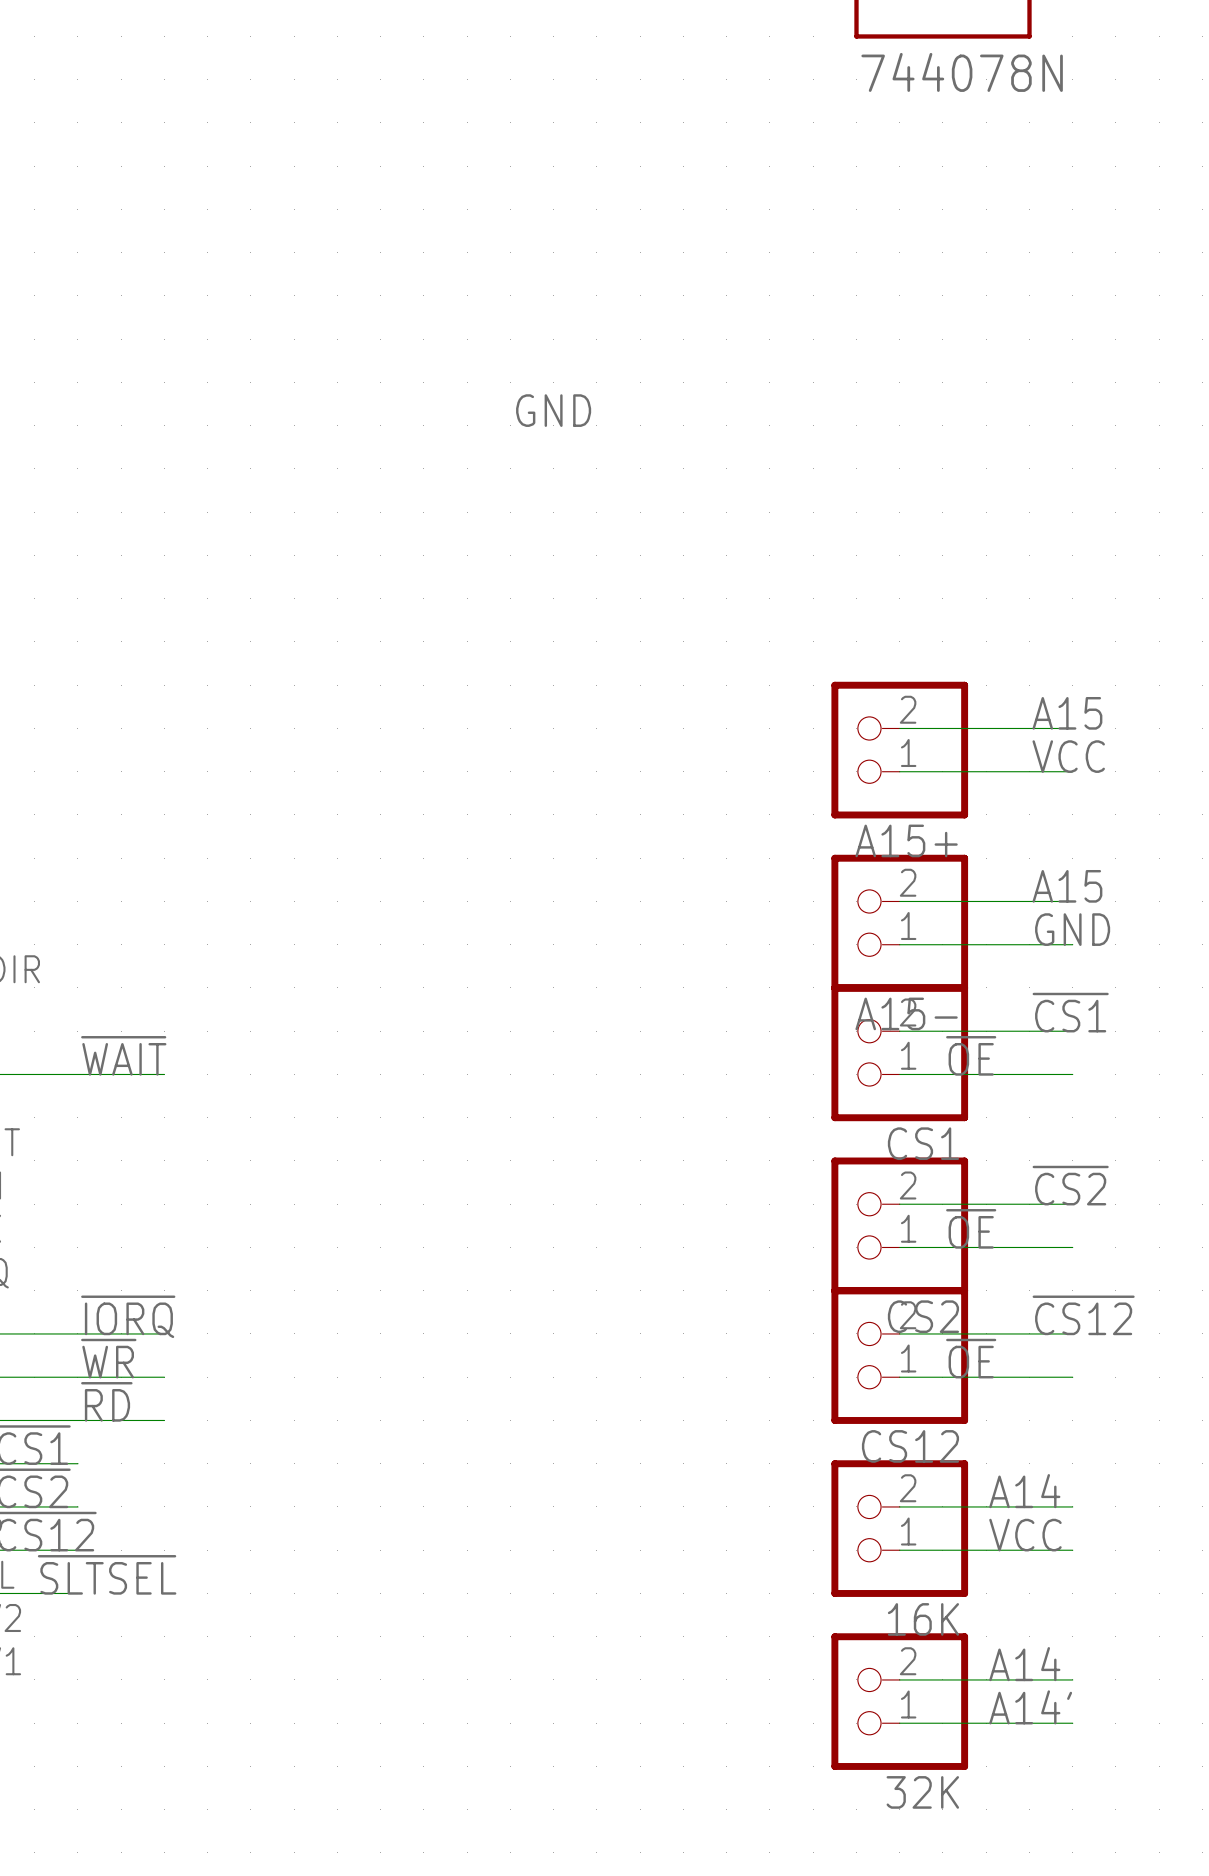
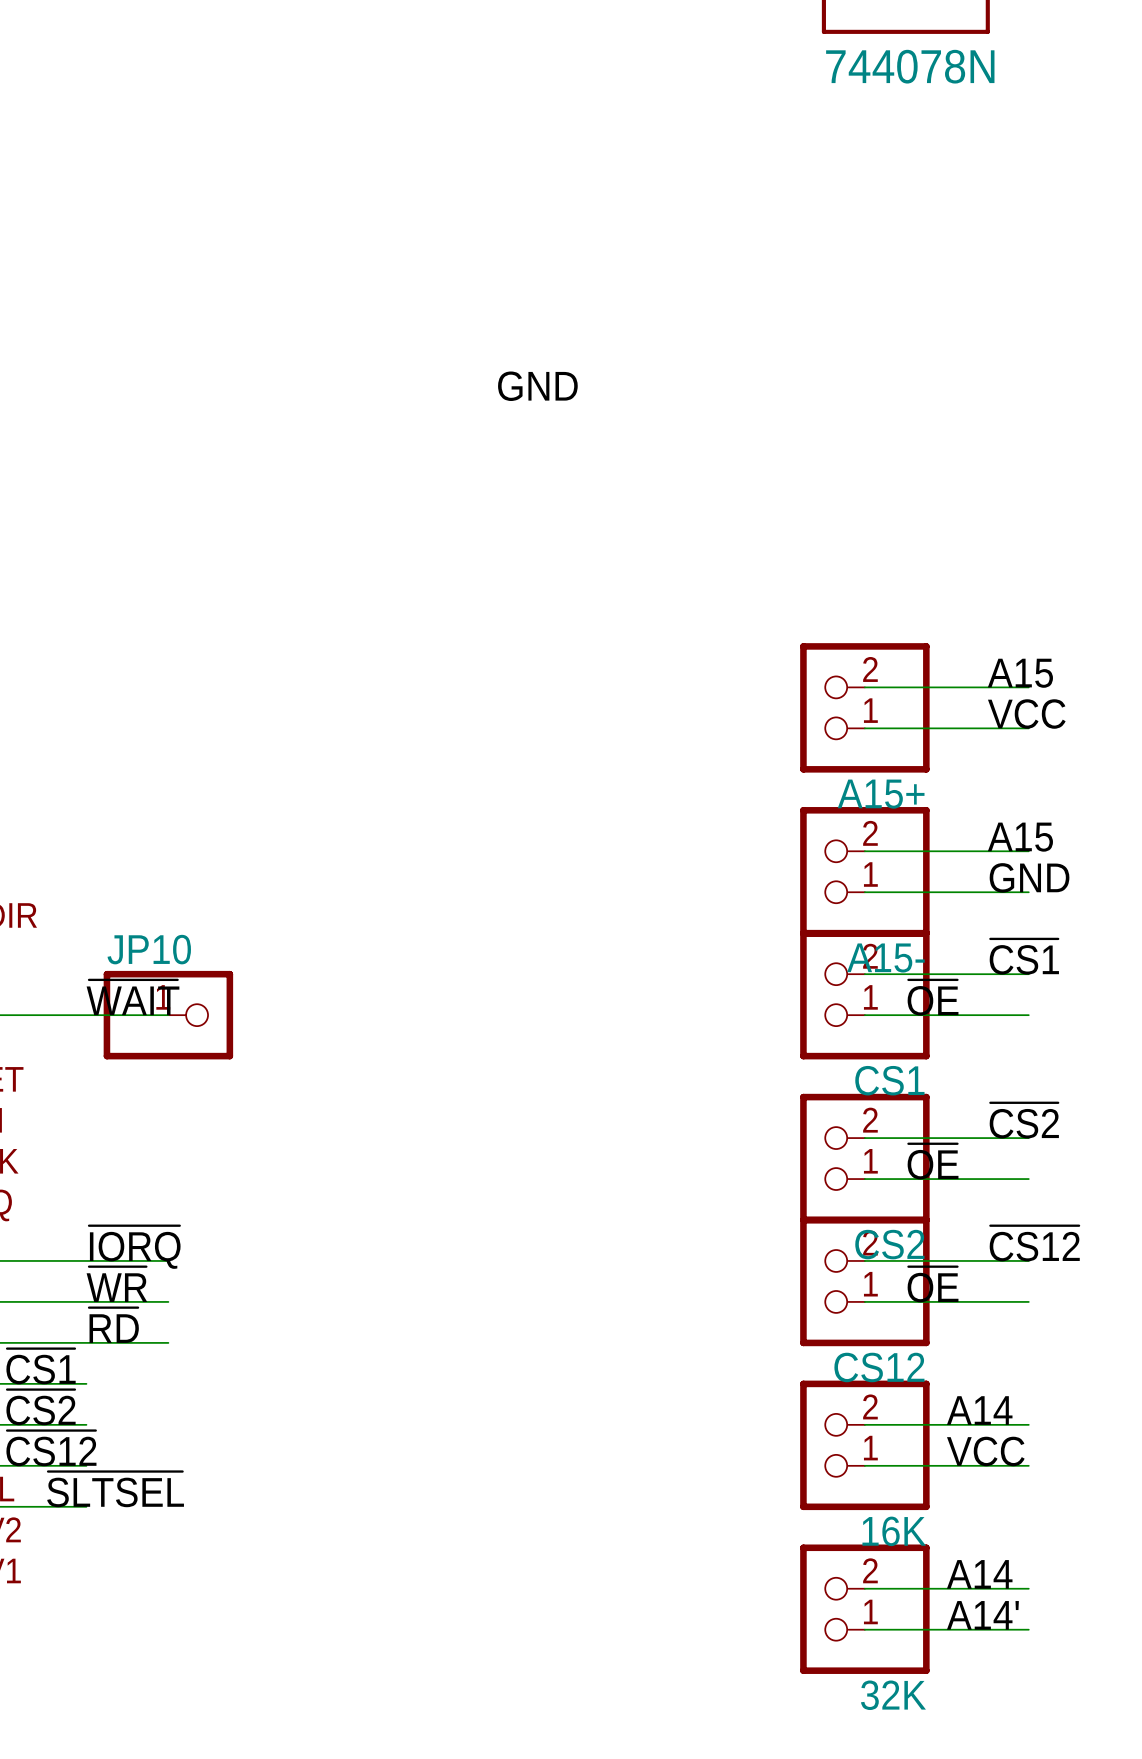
JP10: none -> (168, 1015)

